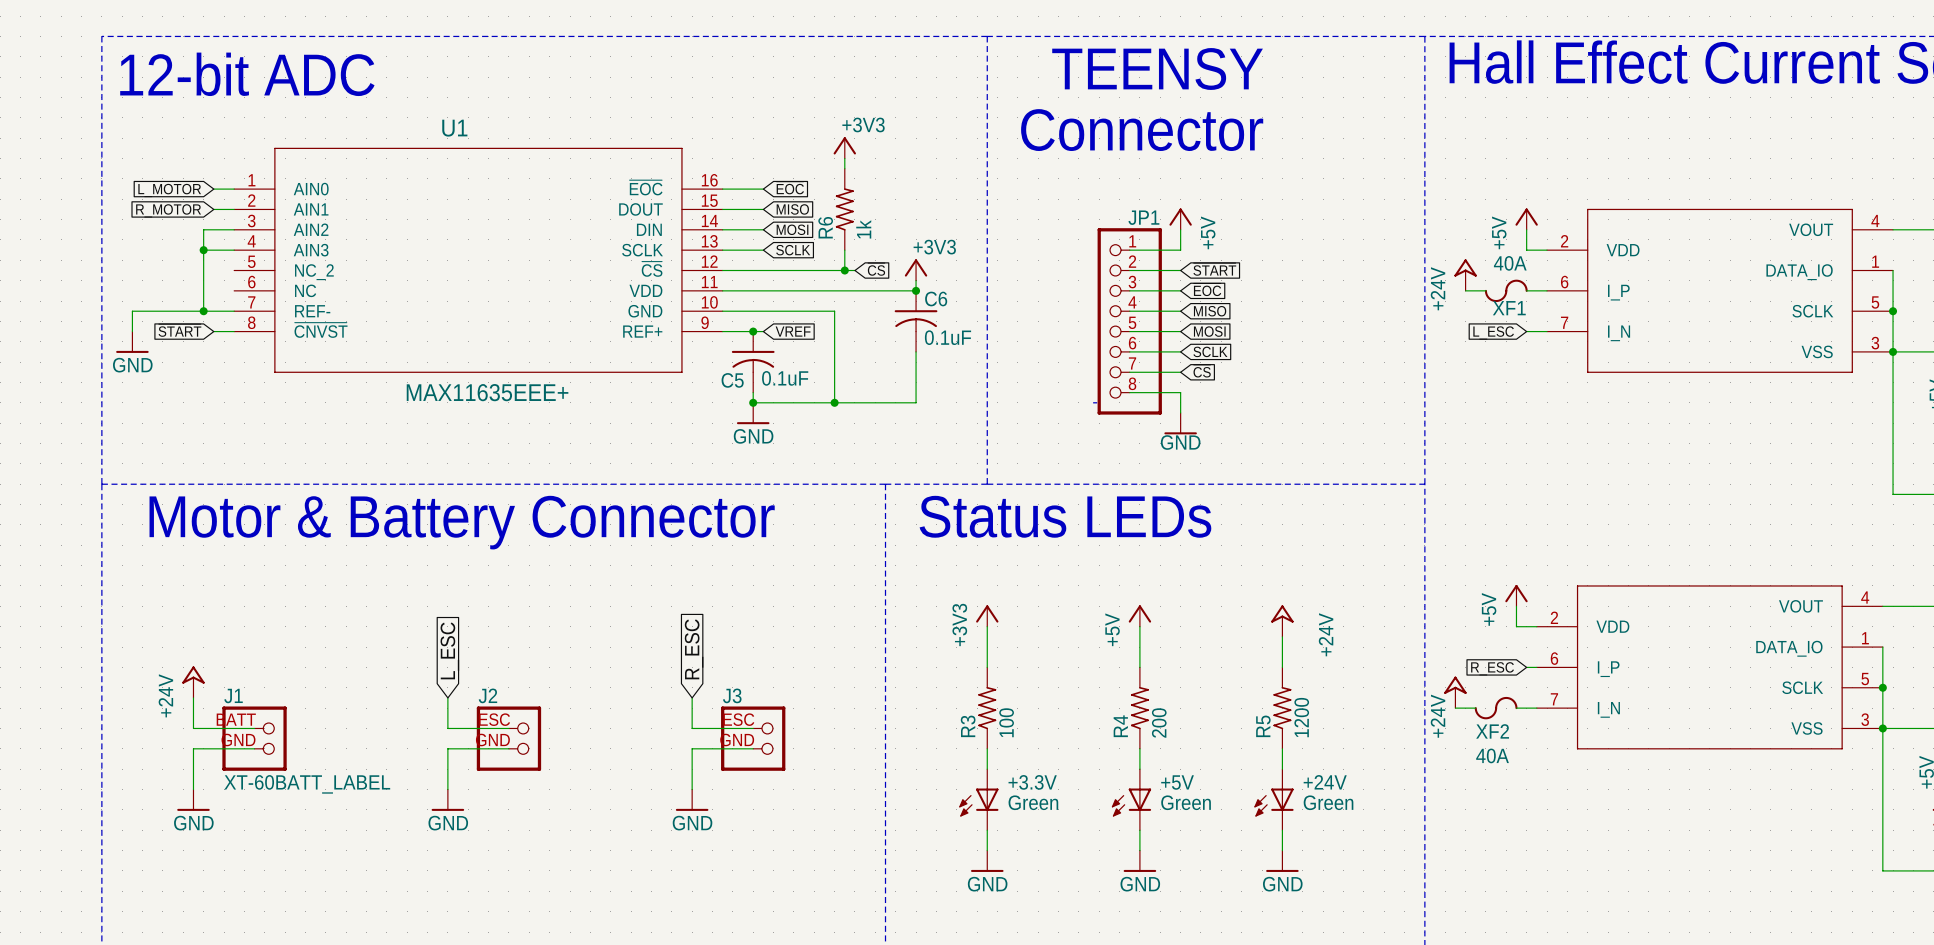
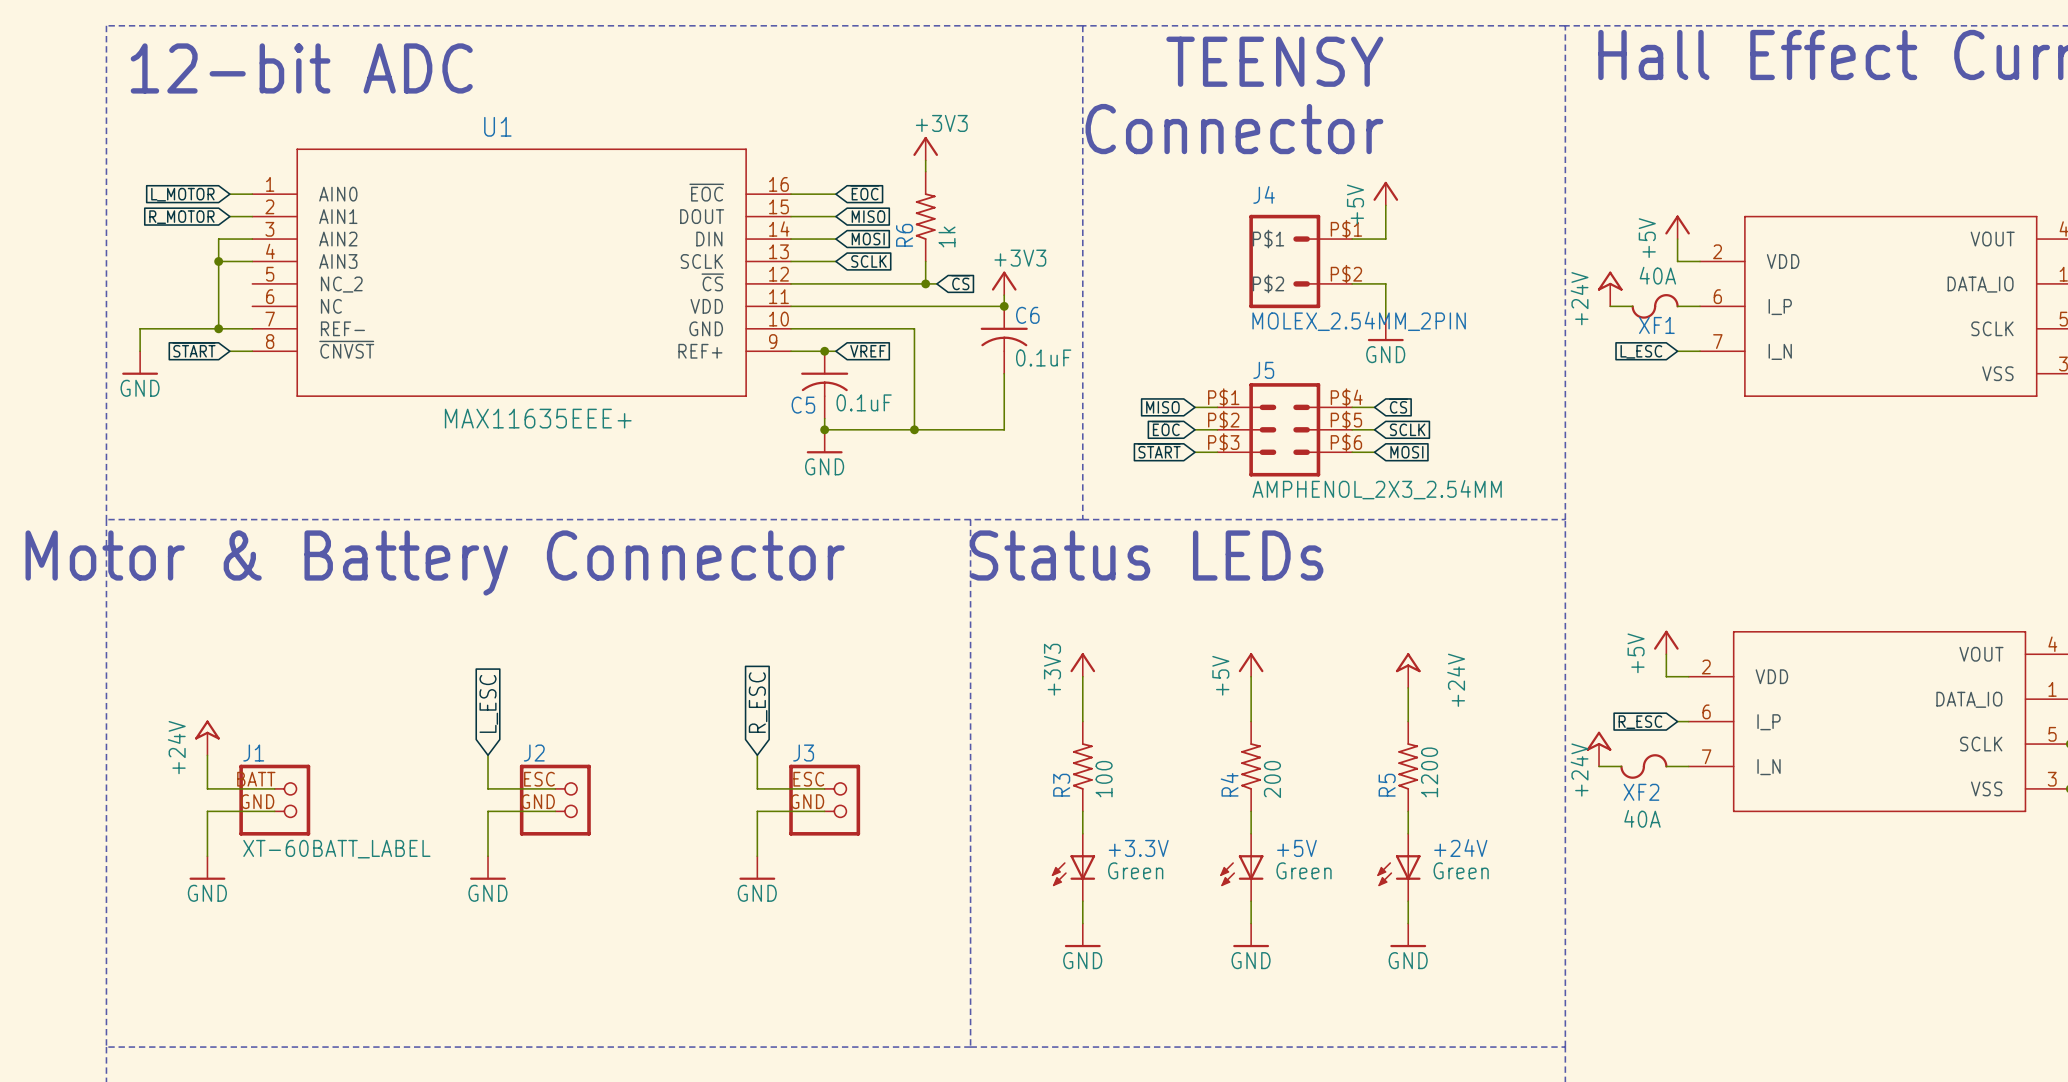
wire: none -> (1385, 205) (1385, 239) (1352, 239)
power symbol position: +5V (1180, 219) -> +5V (1385, 193)
wire: (1180, 229) (1180, 250) (1129, 250) -> none
power symbol text position: +5V (1208, 232) -> +5V (1355, 204)
J4: none -> MOLEX_2.54MM_2PIN (1300, 261)
global label rotation: 0° (1214, 269) -> 180° (1159, 450)
global label position: ~{START} (1214, 269) -> ~{START} (1159, 450)
wire: (1129, 270) (1180, 270) -> none
wire: none -> (1352, 283) (1385, 283) (1385, 317)
global label rotation: 0° (1207, 289) -> 180° (1166, 428)
global label position: ~{EOC} (1207, 289) -> ~{EOC} (1166, 428)
wire: (1129, 311) (1180, 311) -> none
global label rotation: 0° (1210, 311) -> 180° (1162, 407)
global label position: MISO (1210, 311) -> MISO (1162, 407)
JP1: (1129, 321) -> none
wire: (1129, 331) (1180, 331) -> none
global label position: MOSI (1209, 331) -> MOSI (1406, 452)
wire: (1129, 351) (1180, 351) -> none
global label position: SCLK (1210, 351) -> SCLK (1407, 429)
global label position: ~{CS} (1202, 371) -> ~{CS} (1398, 406)
wire: (1129, 372) (1180, 372) -> none
wire: none -> (1195, 407) (1217, 407)
wire: none -> (1352, 407) (1374, 407)
wire: (1129, 392) (1180, 392) (1180, 412) -> none
wire: none -> (1195, 429) (1217, 429)
line: (1093, 402) (1097, 402) -> none
J5: none -> AMPHENOL_2X3_2.54MM (1284, 429)
wire: none -> (1352, 429) (1374, 429)
wire: none -> (1195, 452) (1217, 452)
power symbol position: GND (1180, 423) -> GND (1385, 329)
wire: none -> (1352, 452) (1374, 452)
power symbol text position: GND (1180, 442) -> GND (1385, 354)

